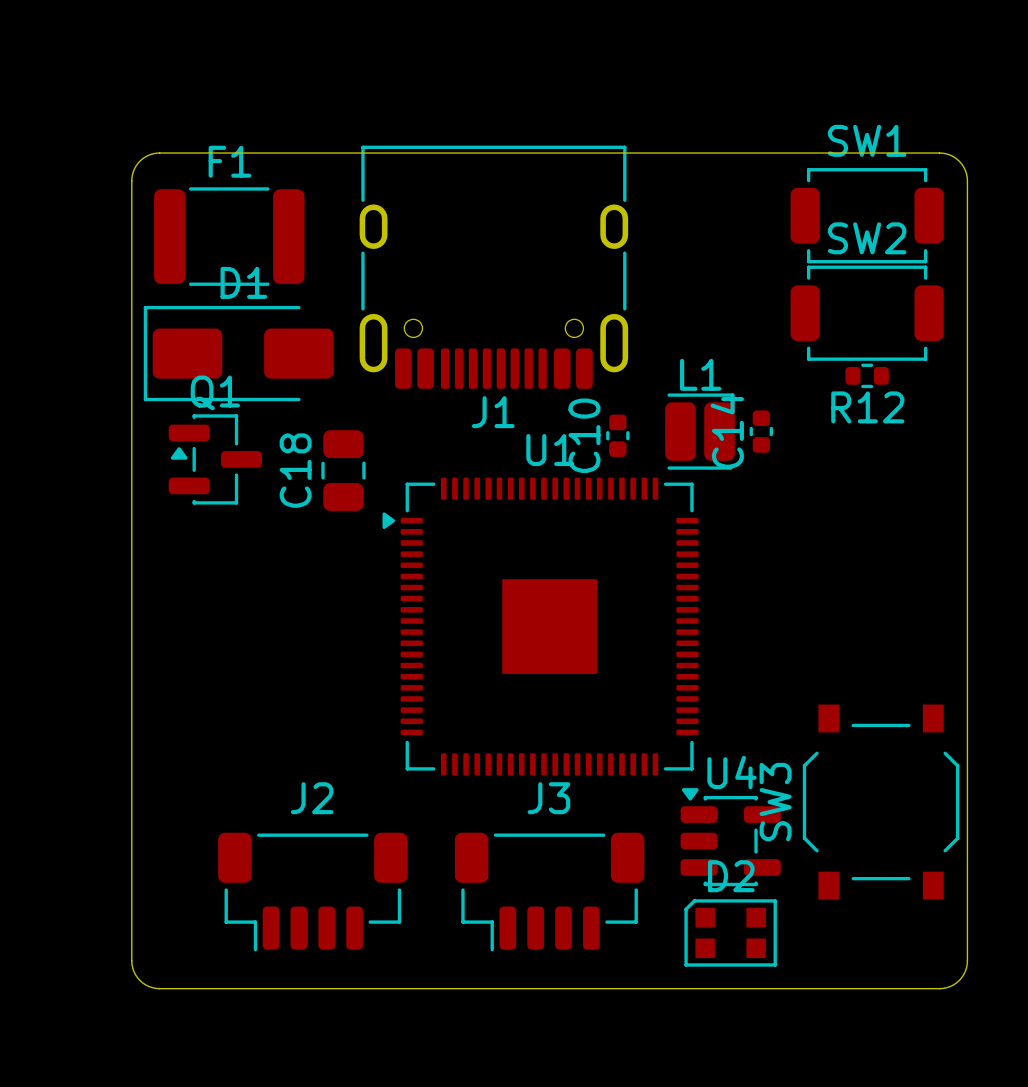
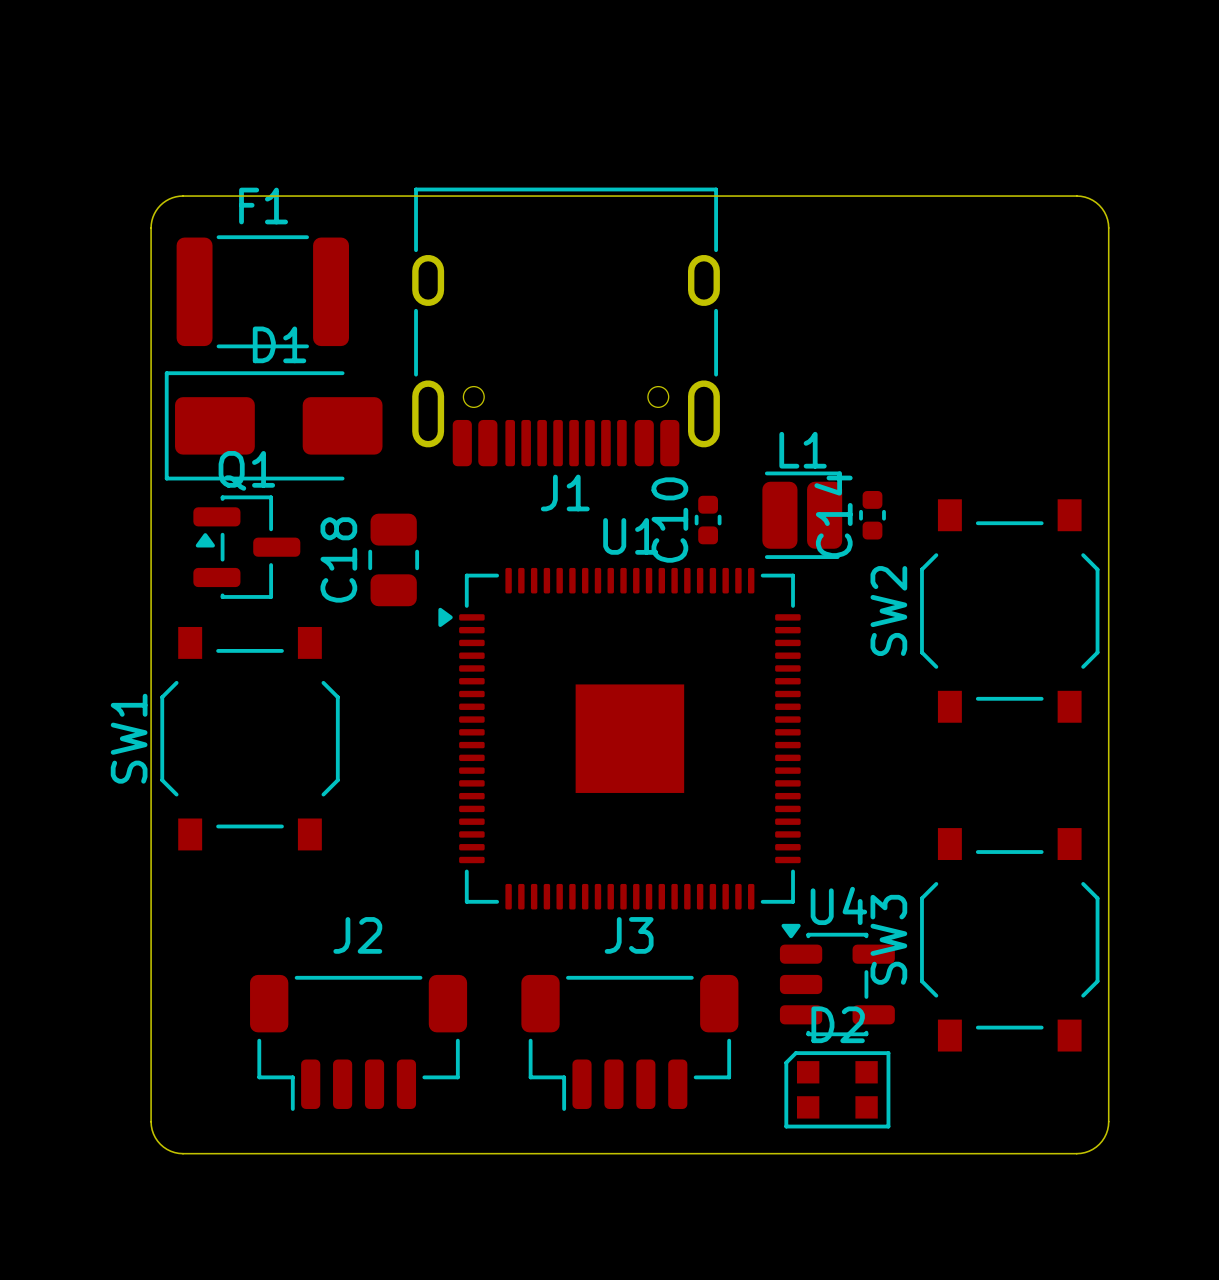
SW1 name position: SW1 (867, 140) -> SW1 (129, 738)
SW1 footprint: [790, 168, 944, 264] -> [160, 626, 340, 851]
SW2 name position: SW2 (867, 238) -> SW2 (888, 611)
SW2 footprint: [790, 265, 944, 361] -> [920, 499, 1100, 723]
R12: (867, 375) -> none

